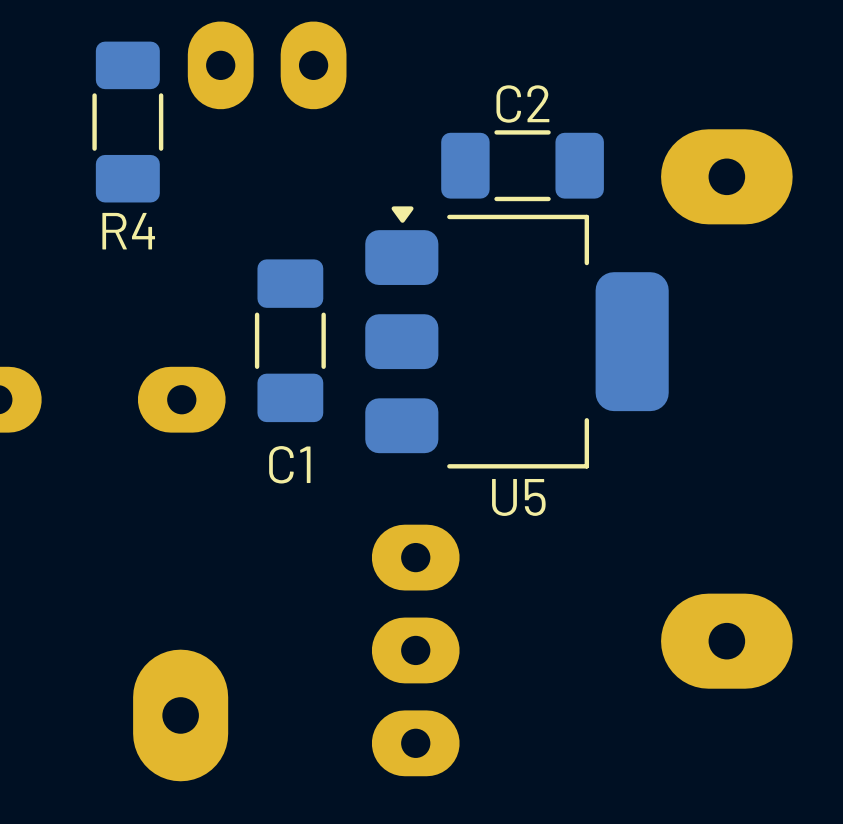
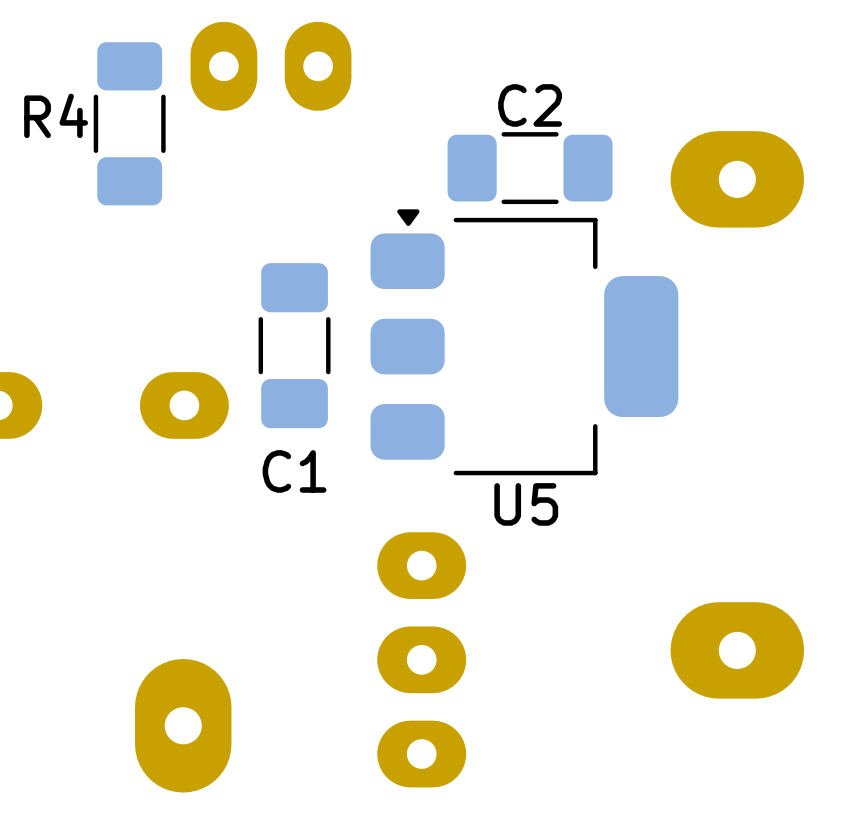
R4 name position: R4 (128, 231) -> R4 (56, 115)

